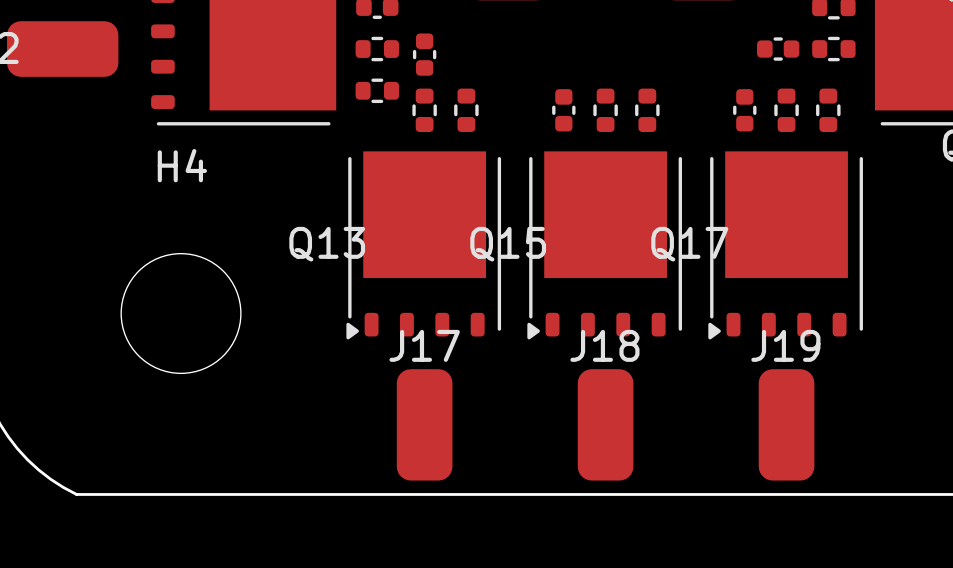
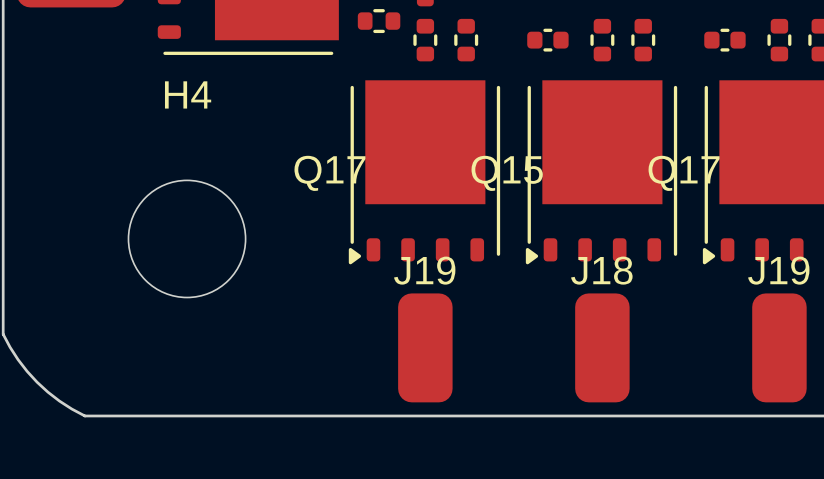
part rotation: 0° (563, 110) -> 90° clockwise (547, 40)
part rotation: 0° (744, 110) -> 90° clockwise (724, 40)
Q13 name: Q13 (327, 244) -> Q17 (329, 173)
J17 name: J17 (424, 345) -> J19 (424, 270)

